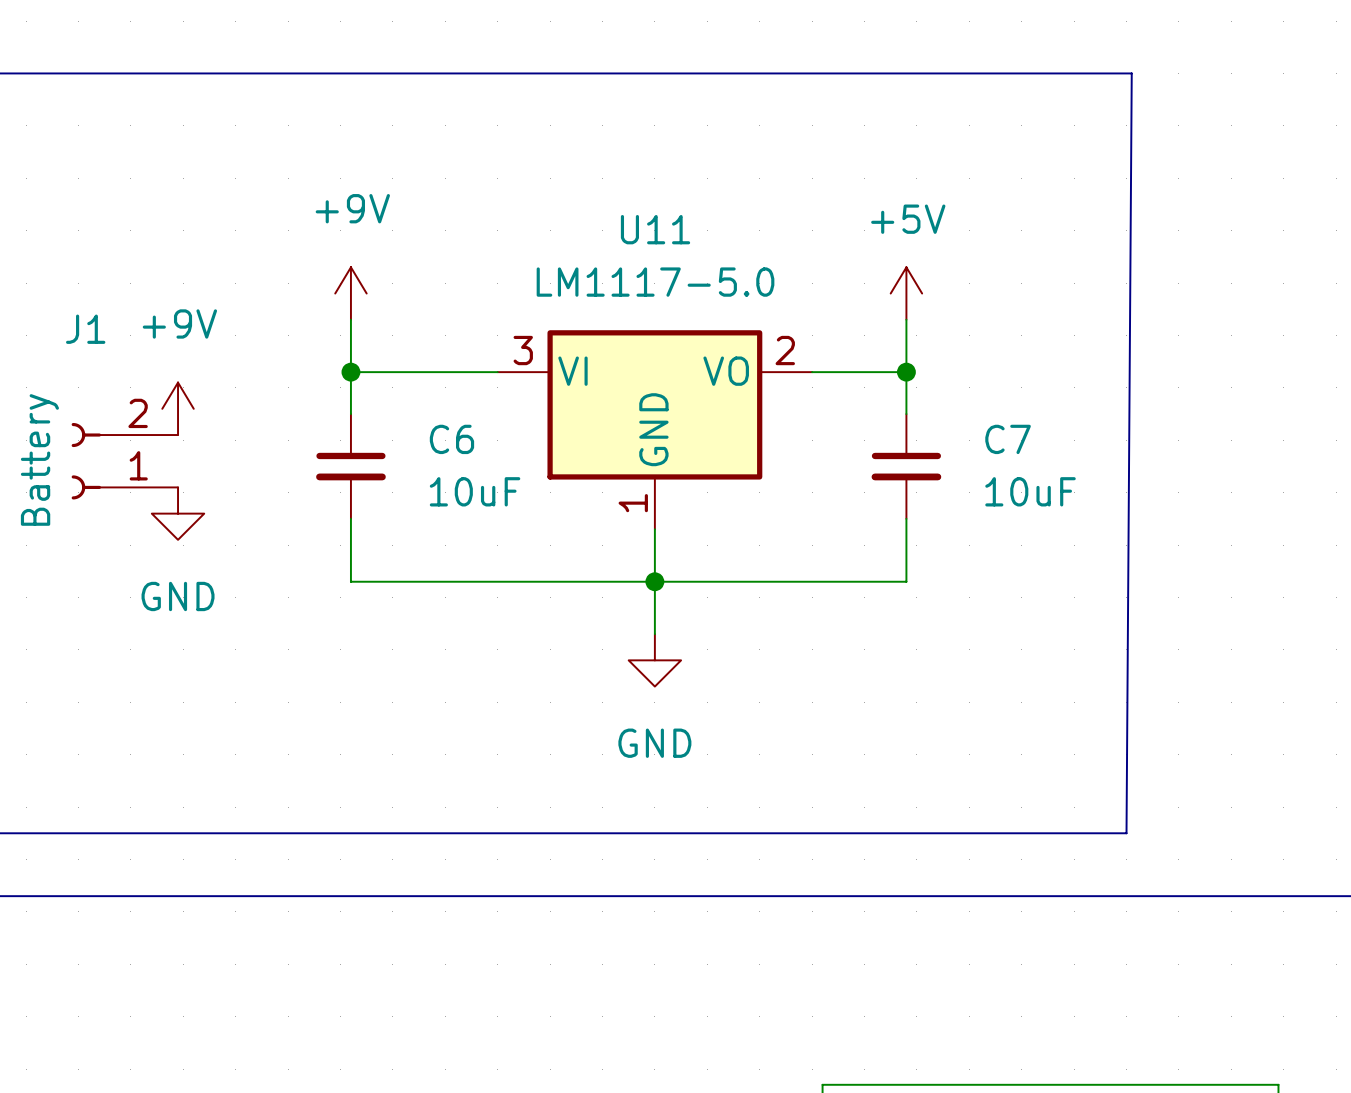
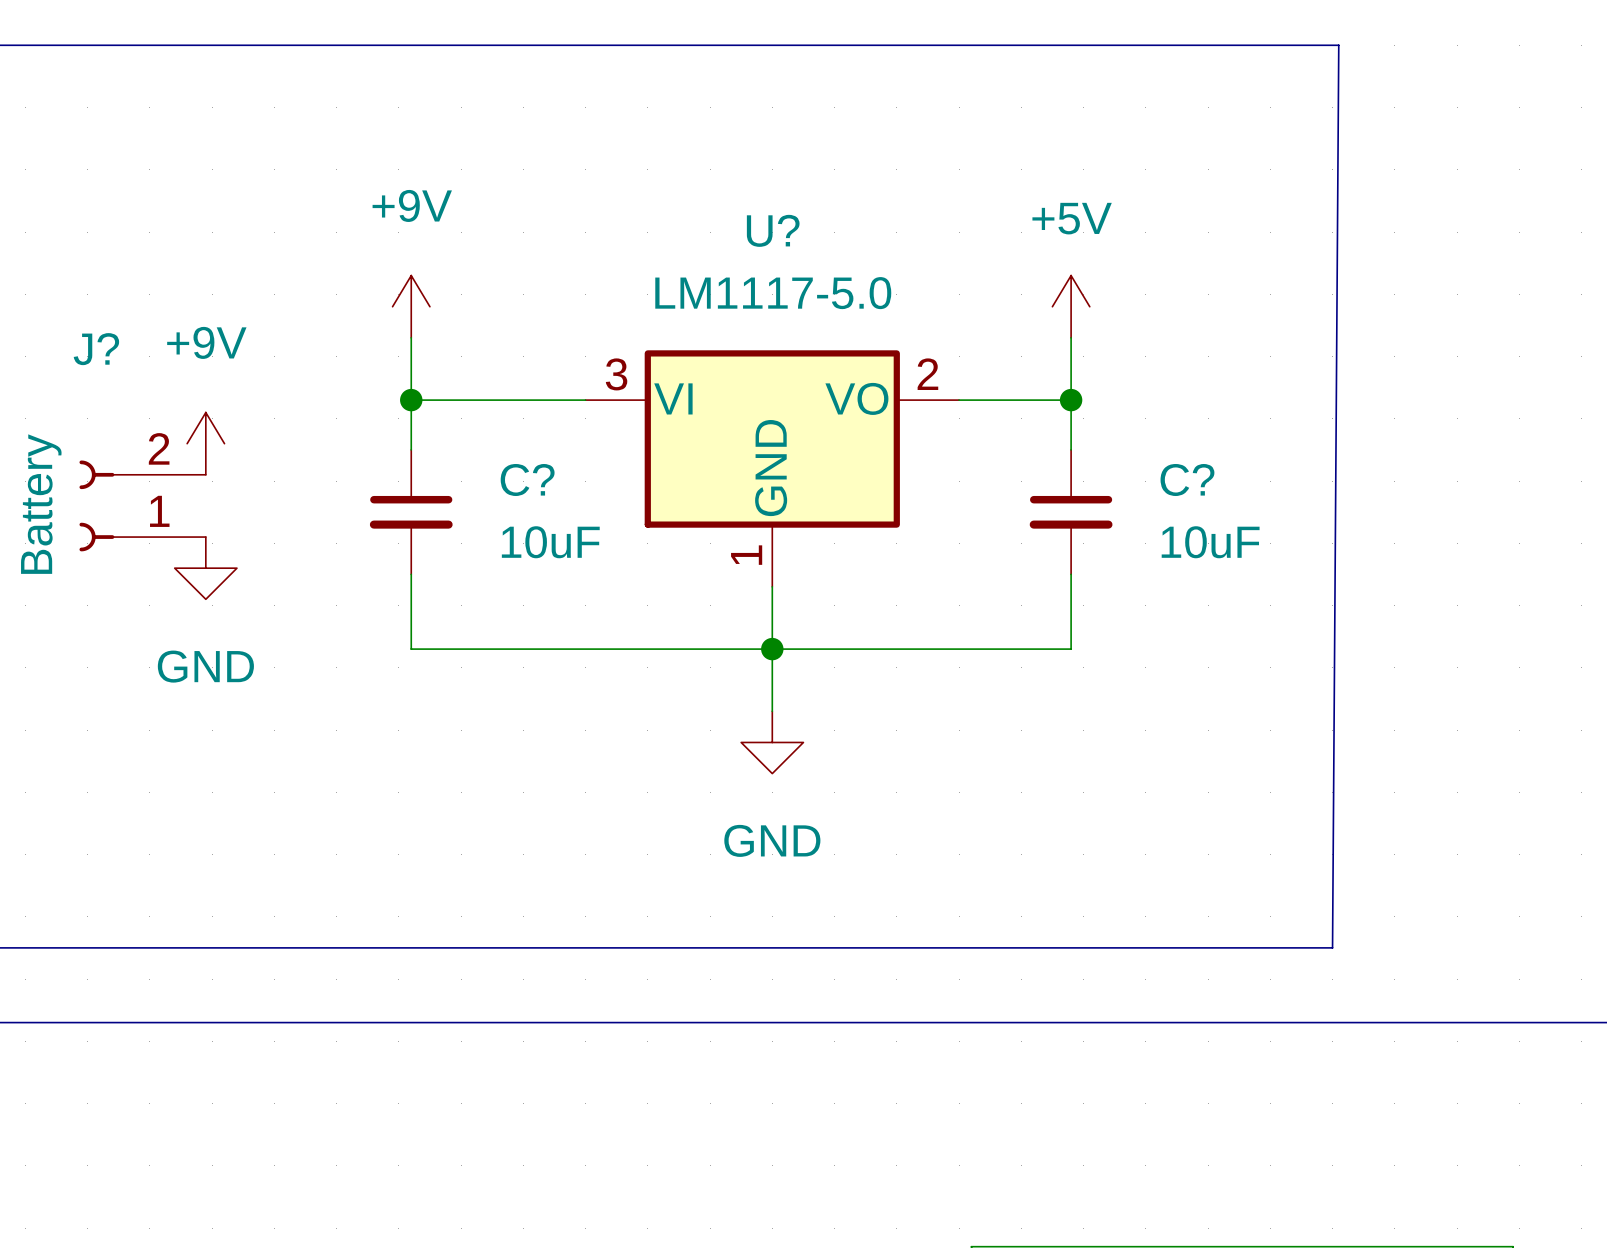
U11 name: U11 (655, 229) -> U? (773, 230)
J1 name: J1 (85, 329) -> J? (96, 349)
C6 name: C6 (451, 439) -> C? (527, 480)
C7 name: C7 (1008, 439) -> C? (1187, 480)

